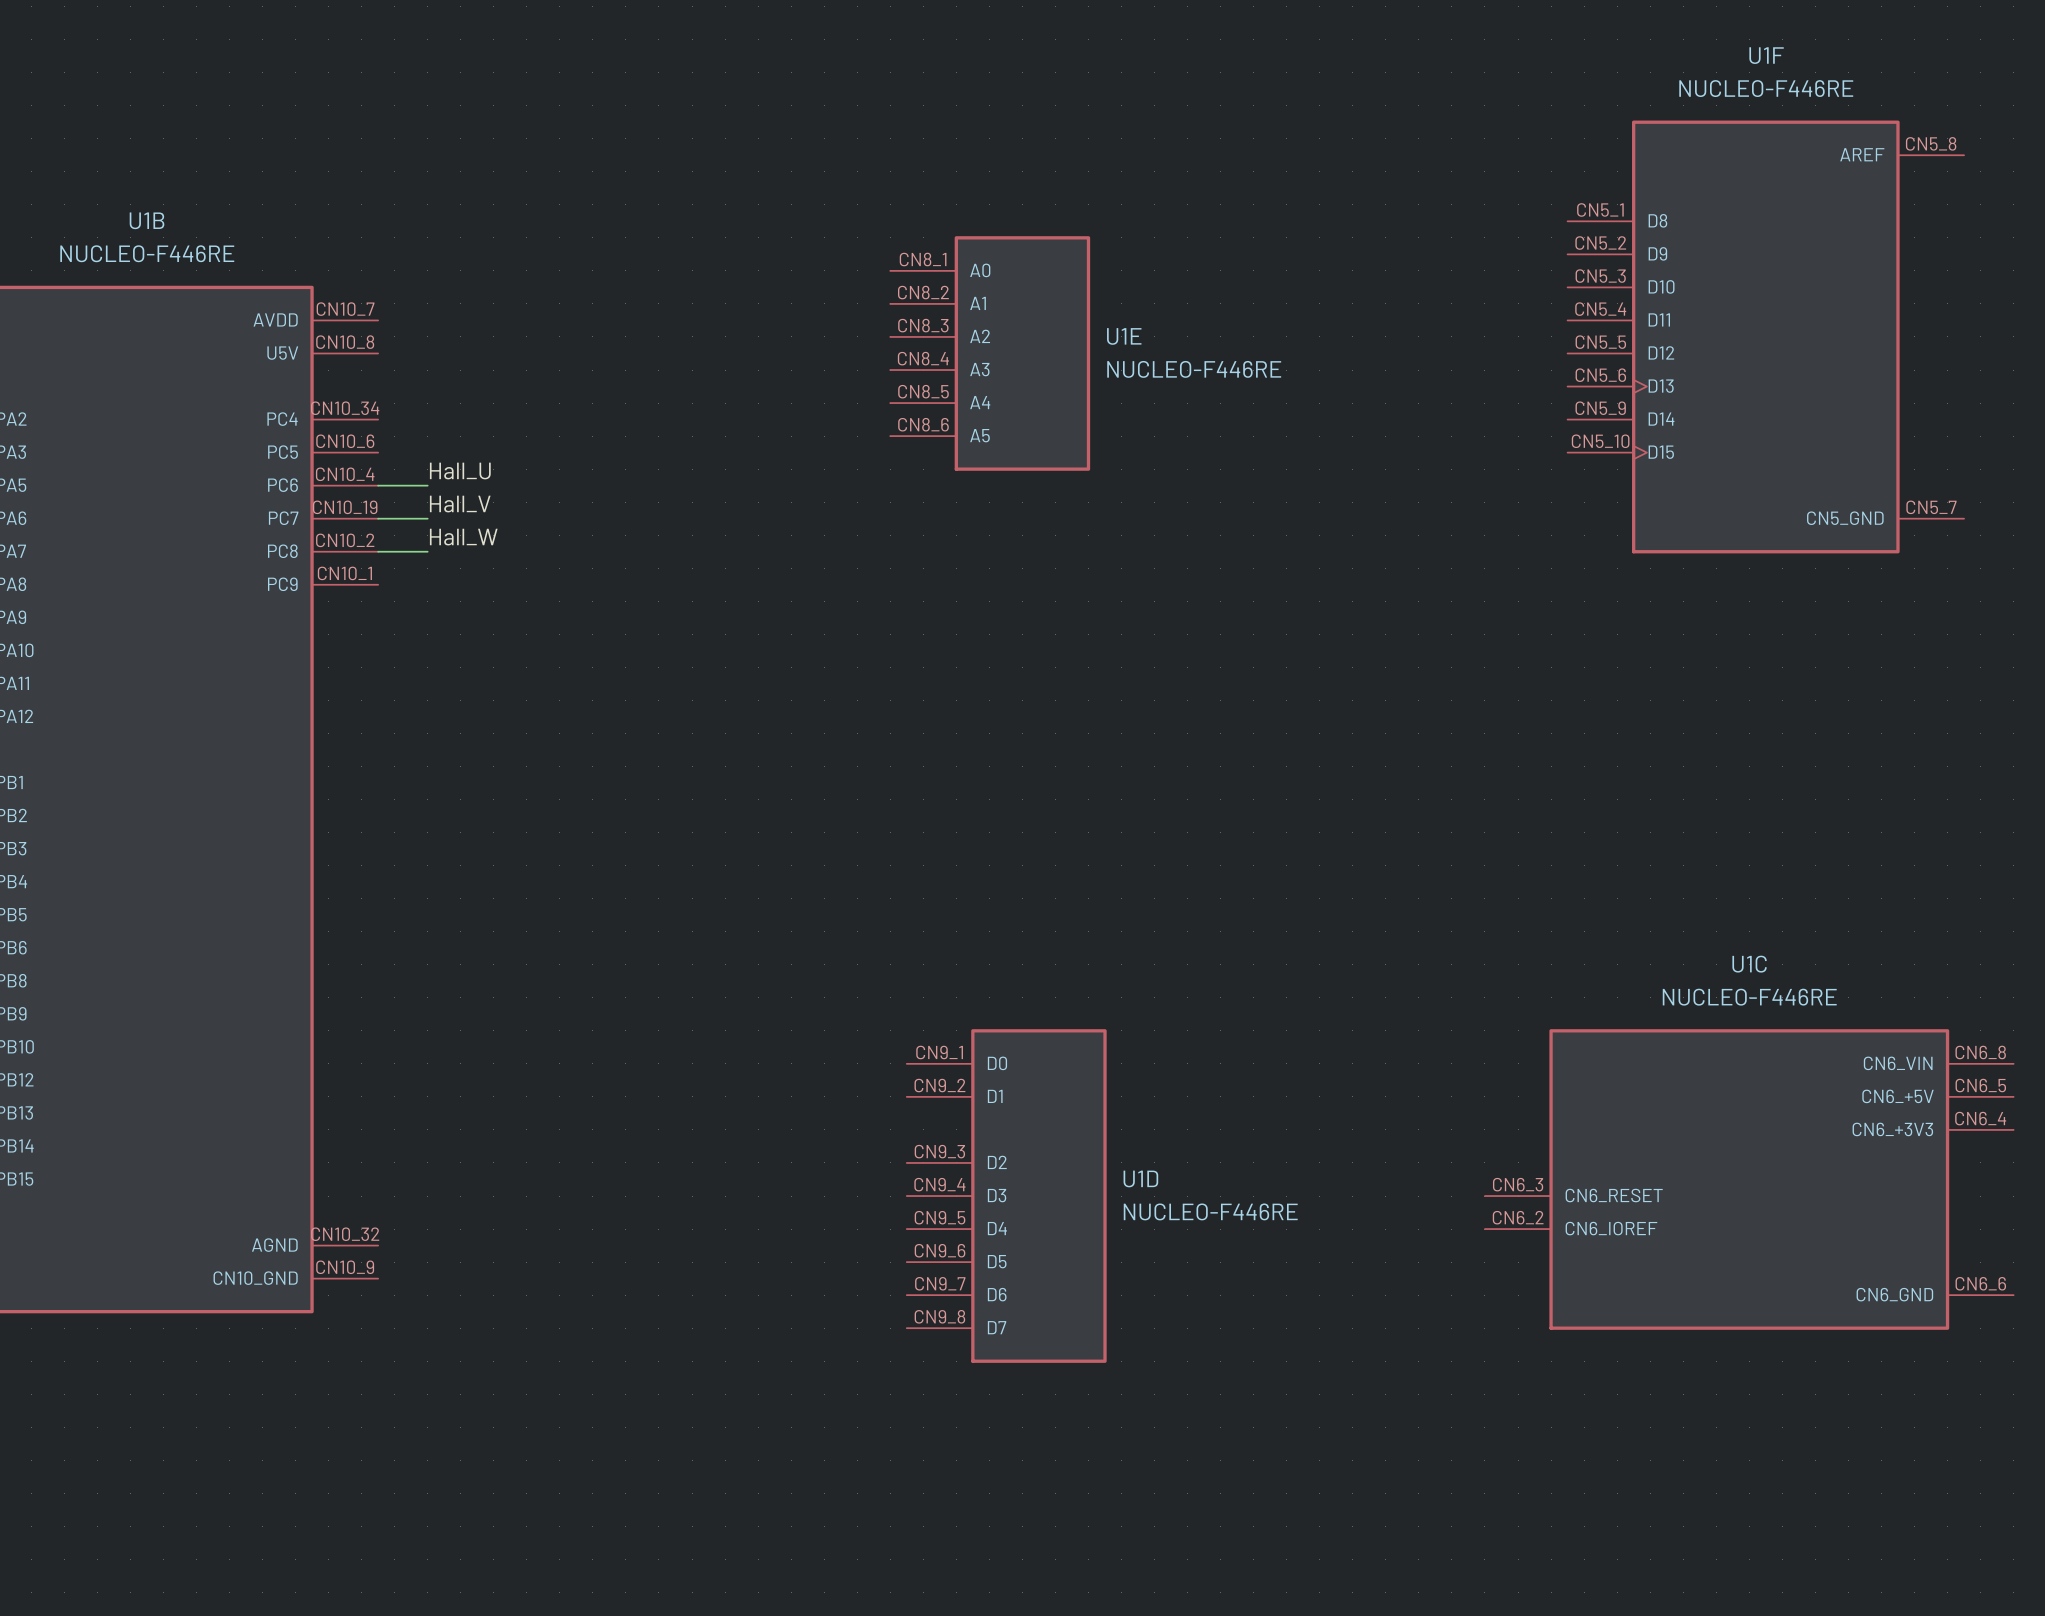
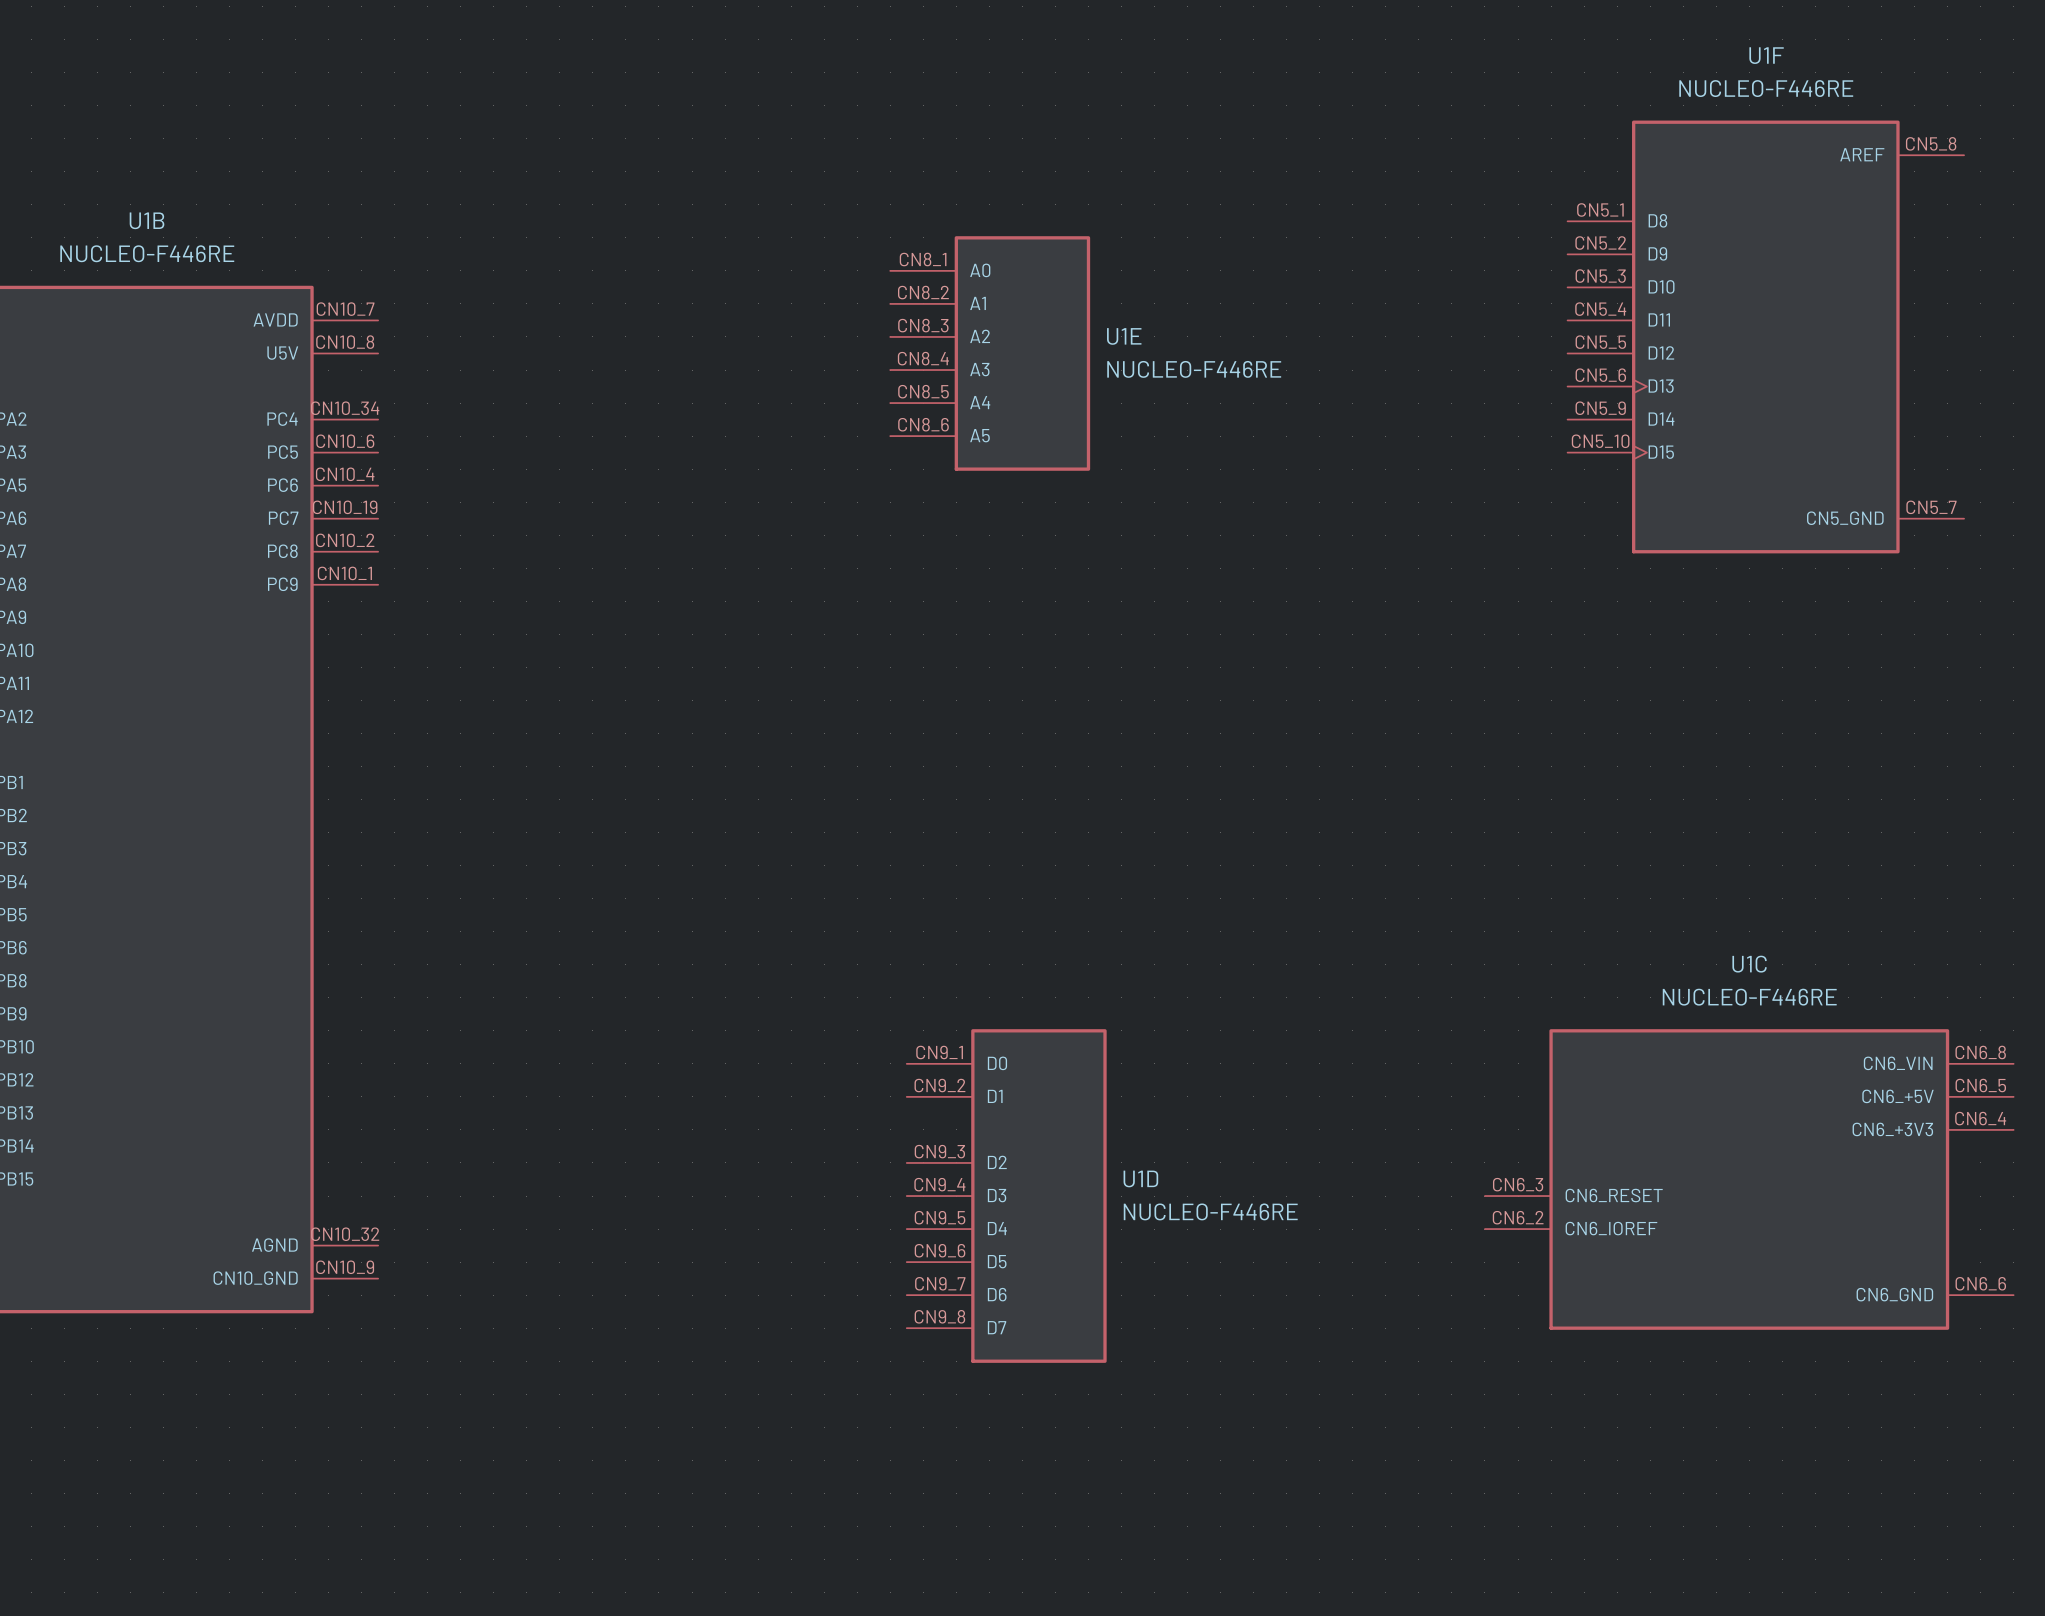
label: Hall_U (460, 471) -> none
wire: (378, 485) (427, 485) -> none
label: Hall_V (460, 504) -> none
wire: (378, 518) (427, 518) -> none
label: Hall_W (463, 537) -> none
wire: (378, 551) (427, 551) -> none

